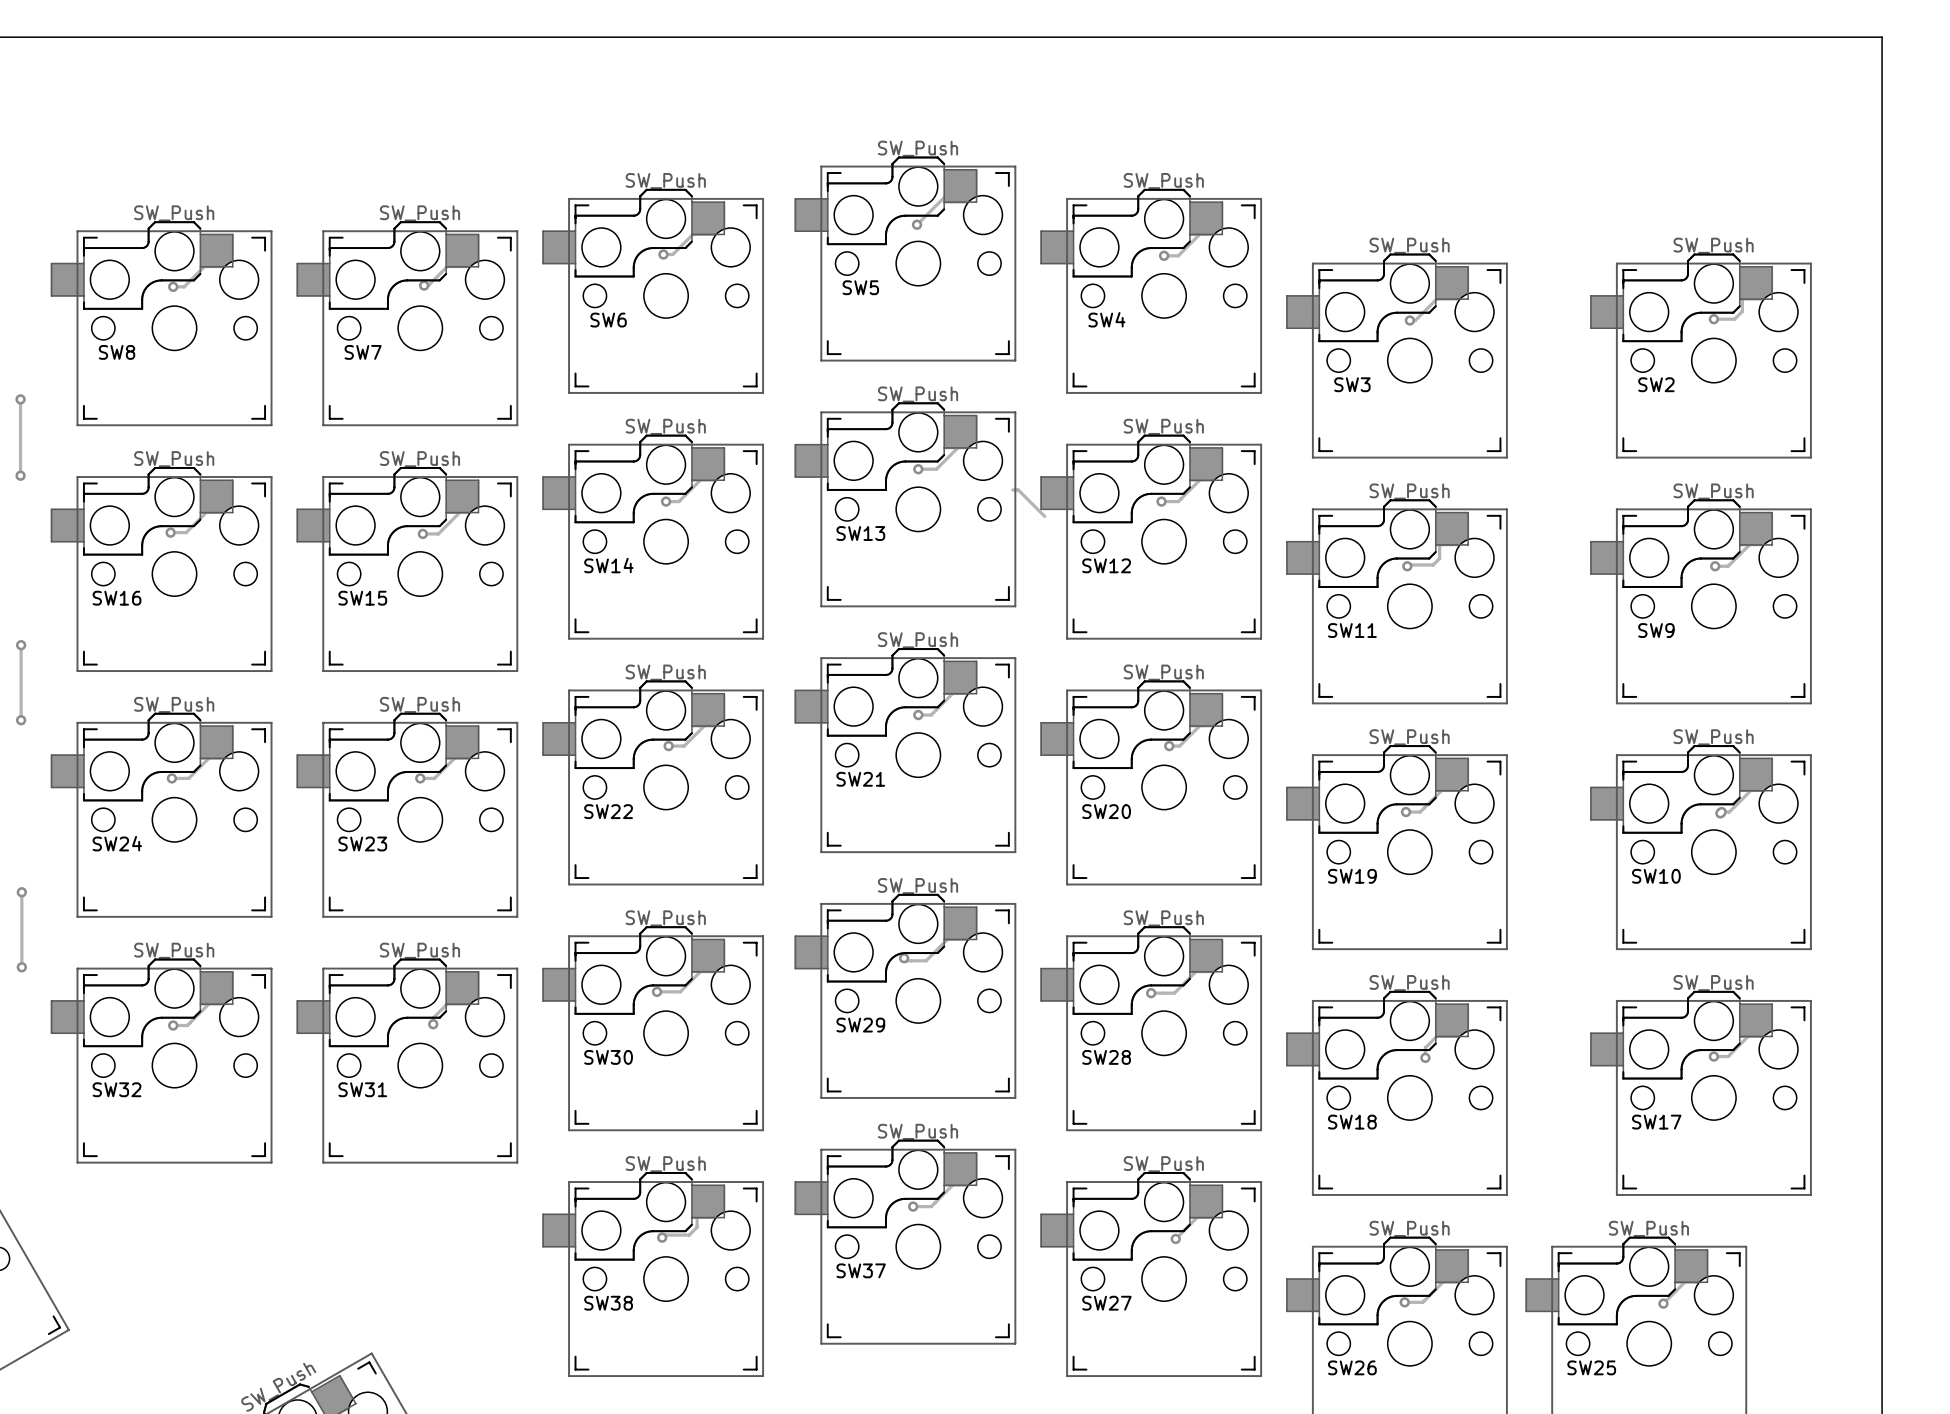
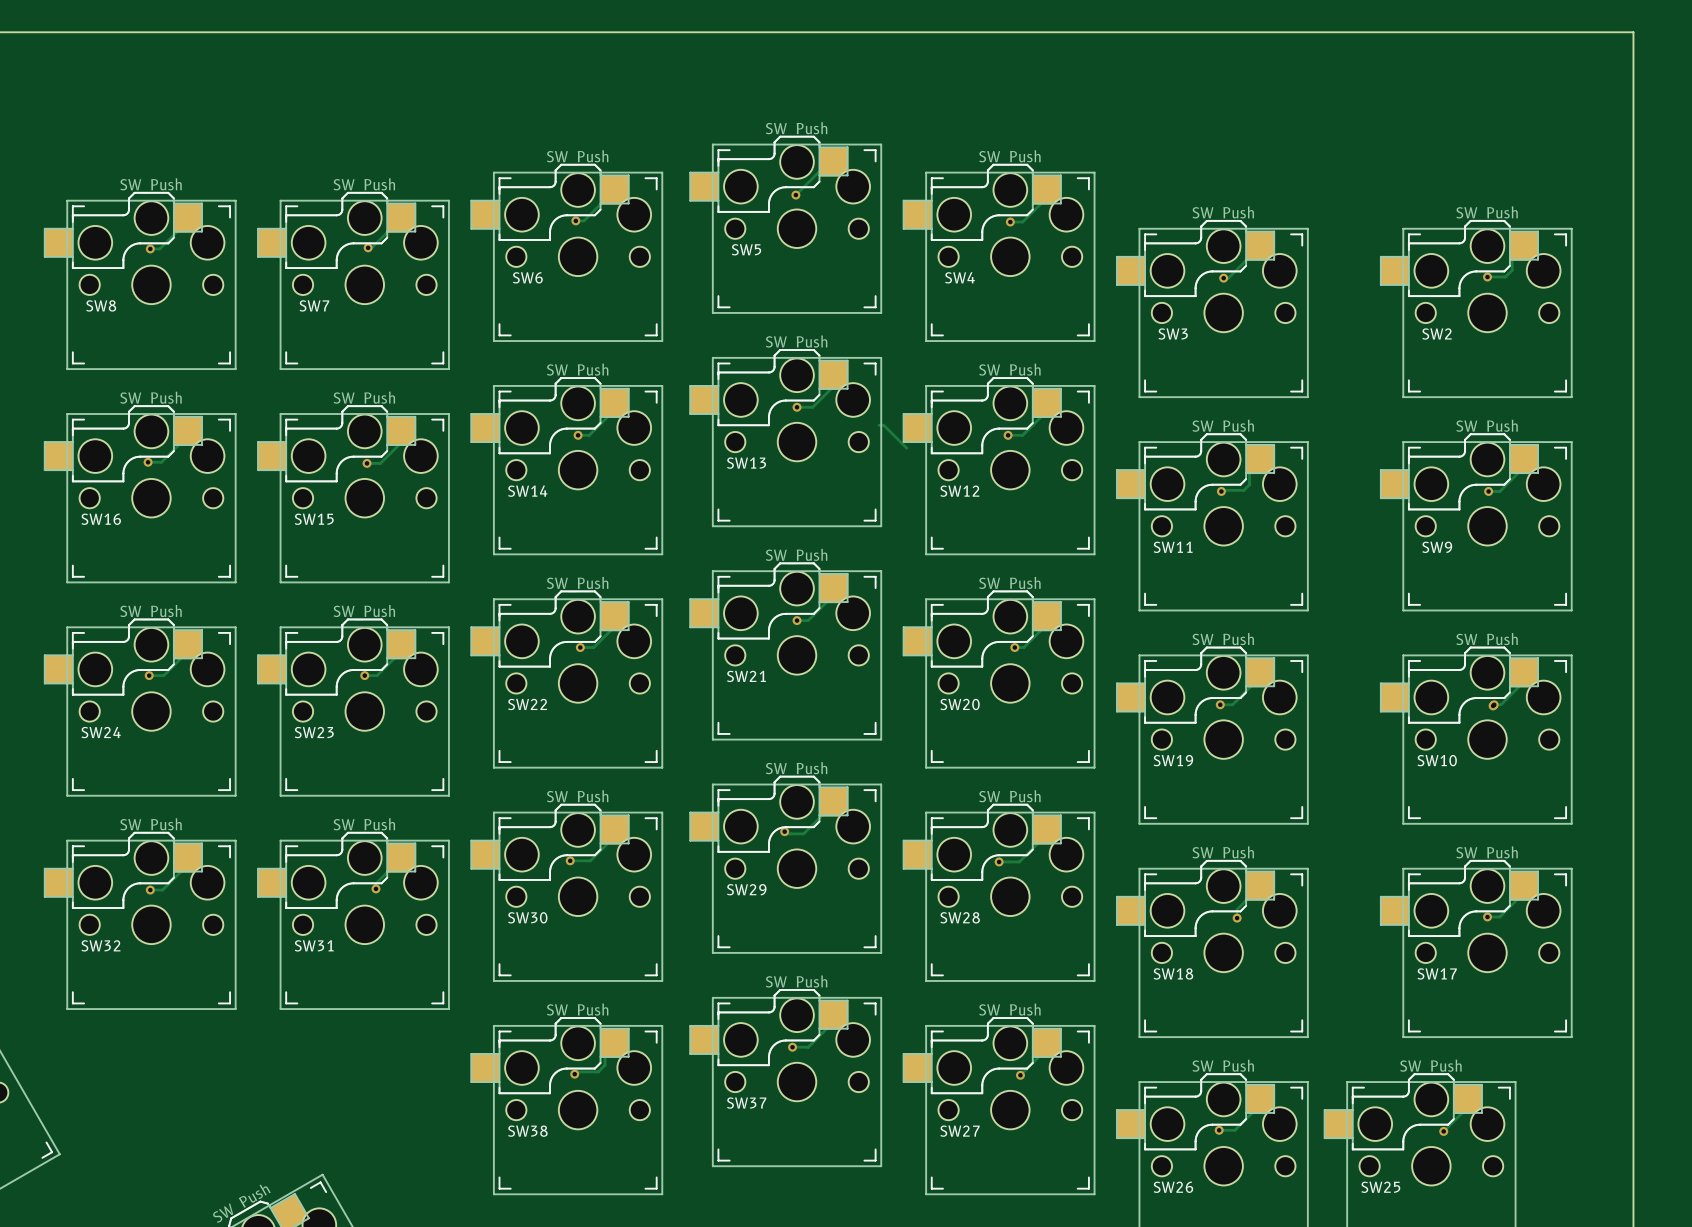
track: (20, 399) (20, 475) -> none
via: (20, 399) -> none
via: (20, 475) -> none
track: (21, 645) (21, 720) -> none
via: (21, 645) -> none
via: (21, 720) -> none
track: (21, 892) (21, 967) -> none
via: (21, 892) -> none
via: (21, 967) -> none

